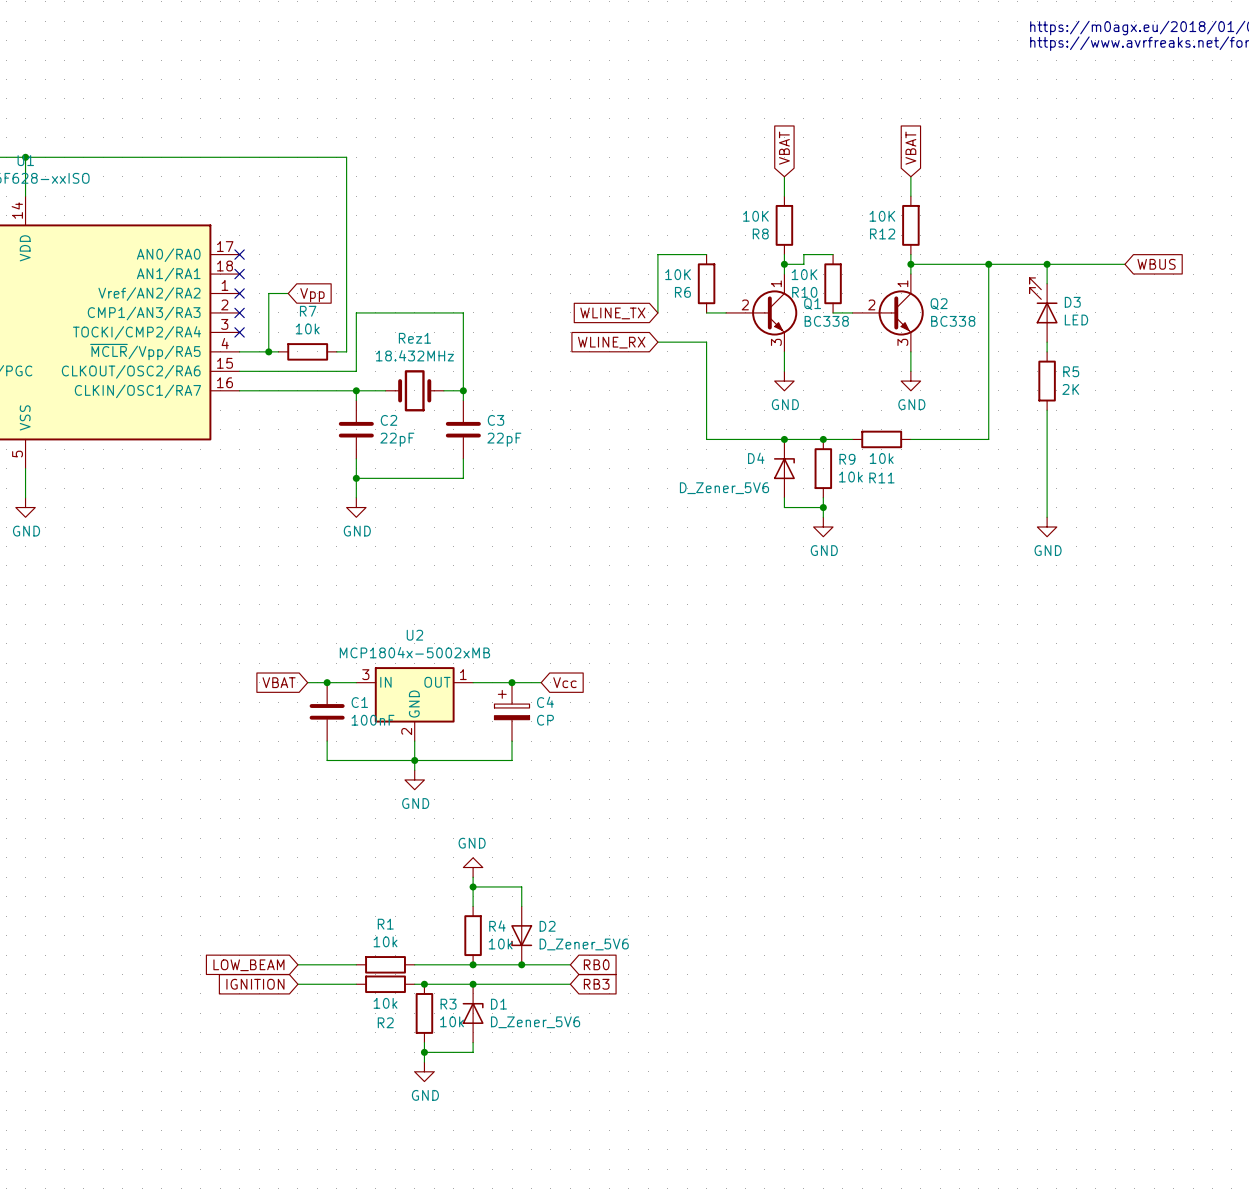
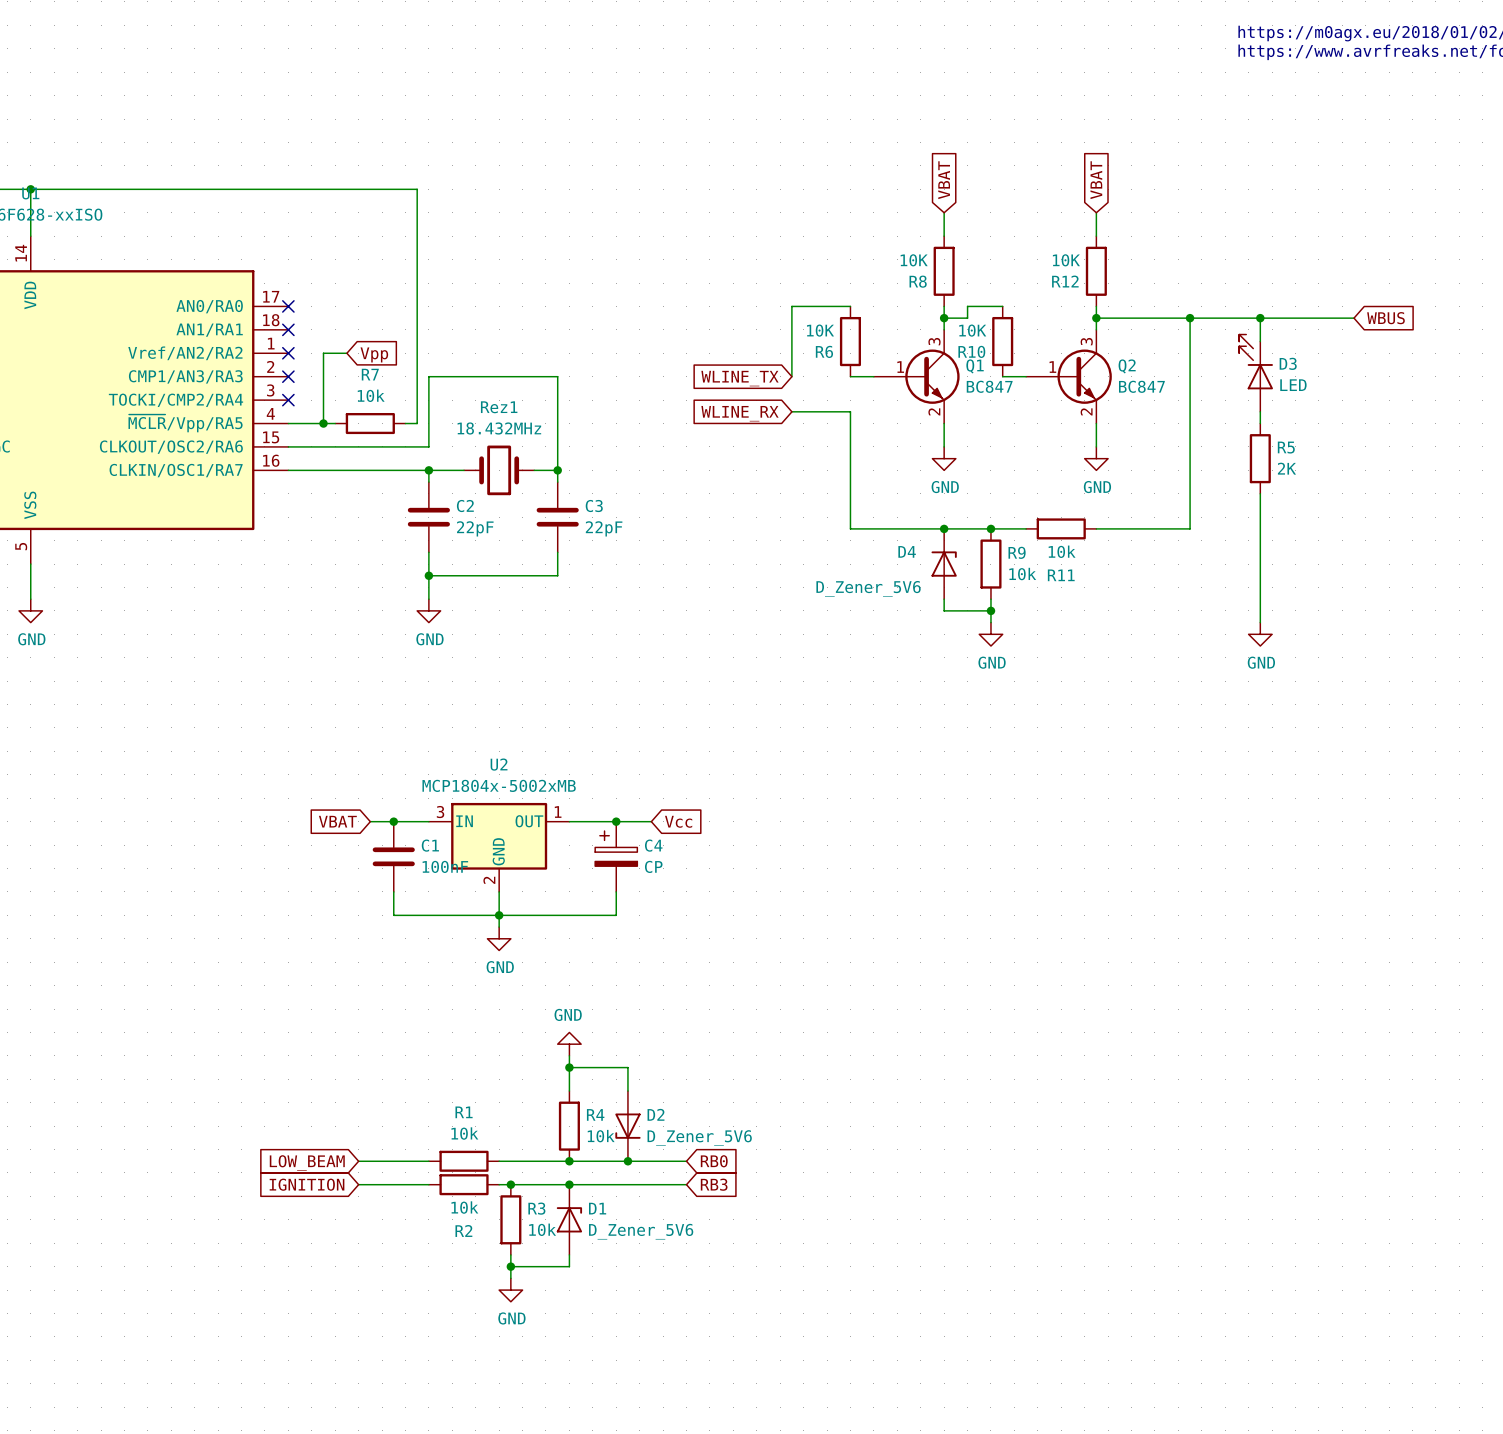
Q1 symbol: [726, 274, 798, 352] -> [873, 329, 960, 424]
Q2 symbol: [852, 274, 924, 352] -> [1026, 329, 1112, 424]
Q1 value: BC338 (826, 321) -> BC847 (989, 386)
Q2 value: BC338 (953, 321) -> BC847 (1141, 386)

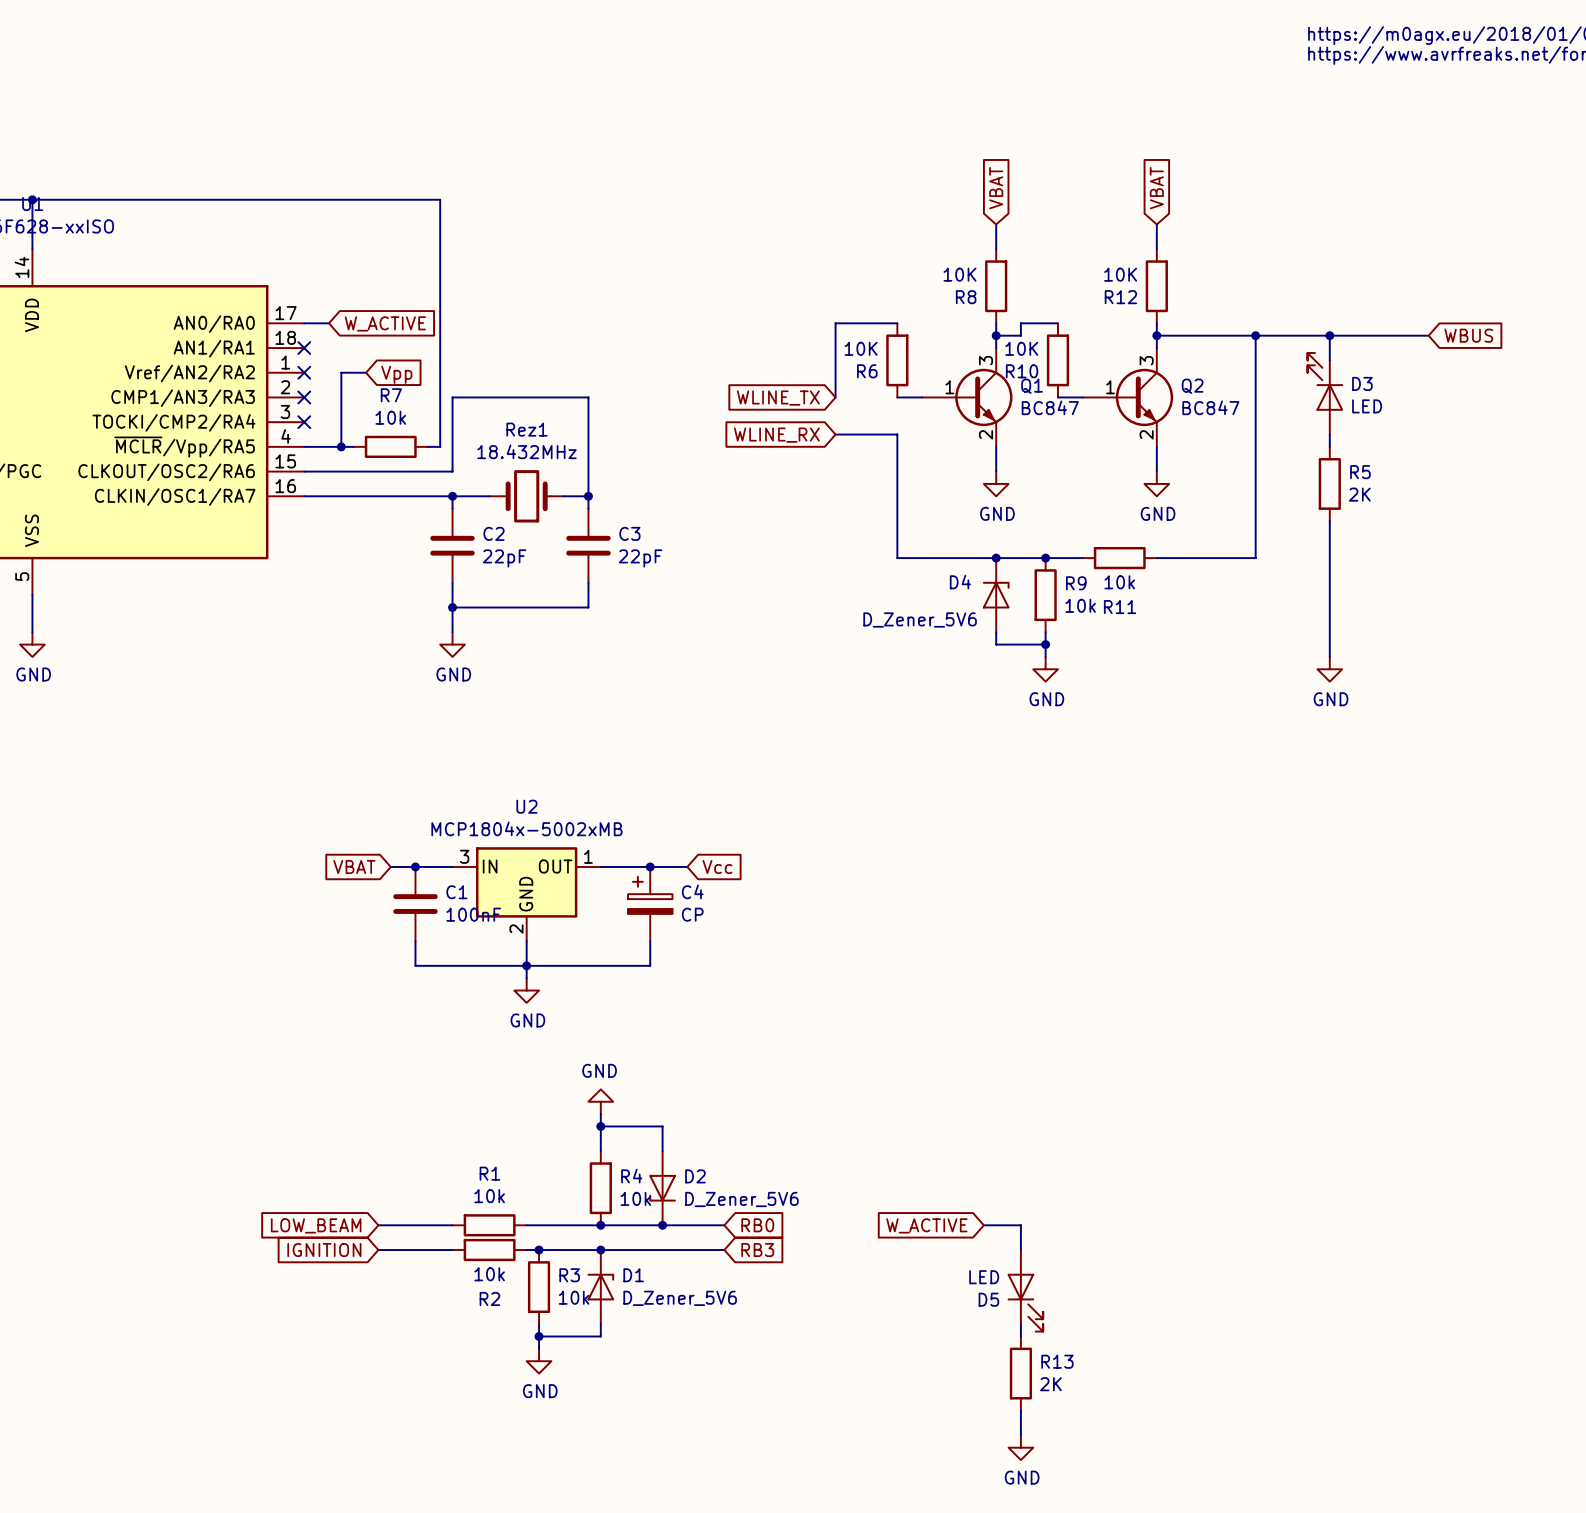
wire: none -> (304, 323) (328, 323)
no-connect mark: (288, 306) -> none
global label: none -> W_ACTIVE (385, 323)
wire: none -> (983, 1225) (1020, 1225) (1020, 1250)
global label: none -> W_ACTIVE (926, 1225)
D5: none -> LED (1025, 1290)
wire: none -> (1020, 1324) (1020, 1336)
R13: none -> 2K (1020, 1373)
wire: none -> (1020, 1410) (1020, 1435)
power symbol: none -> GND (1020, 1447)

